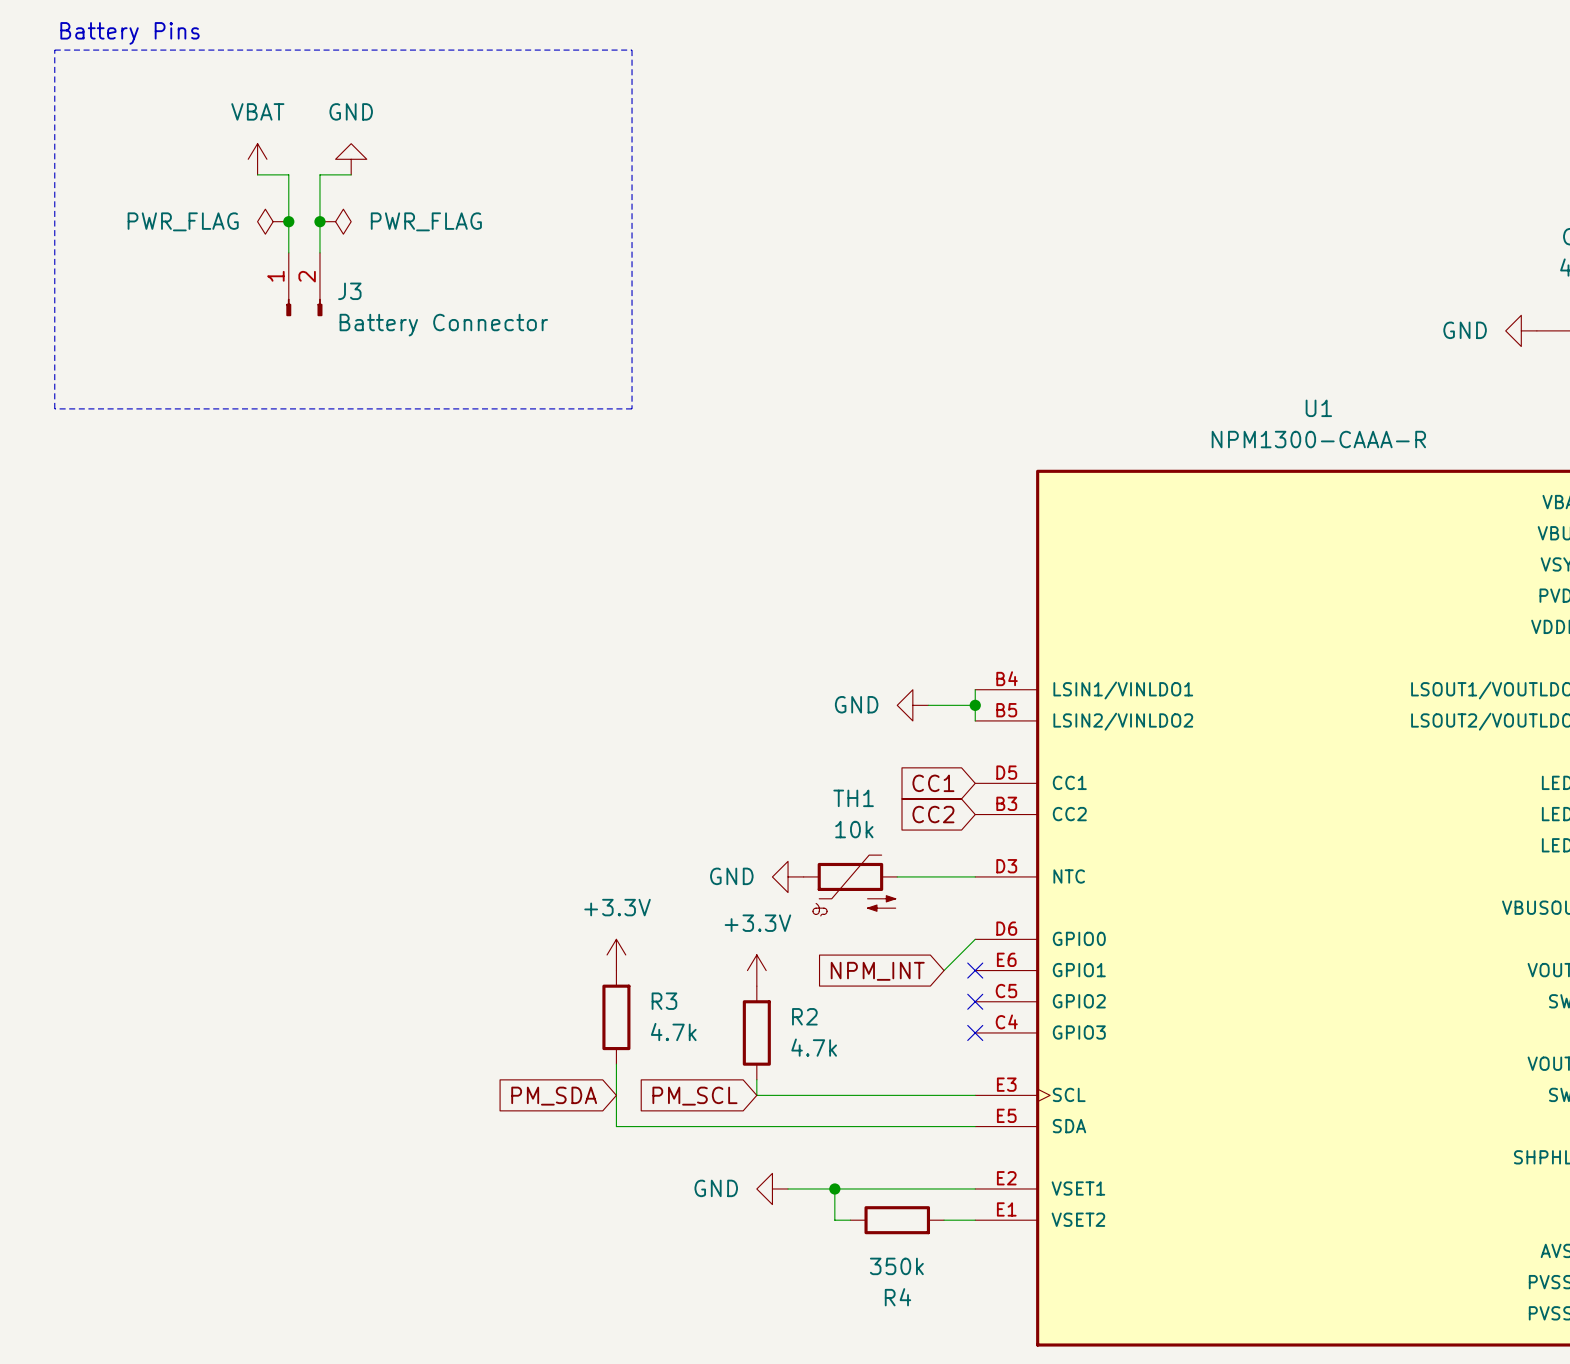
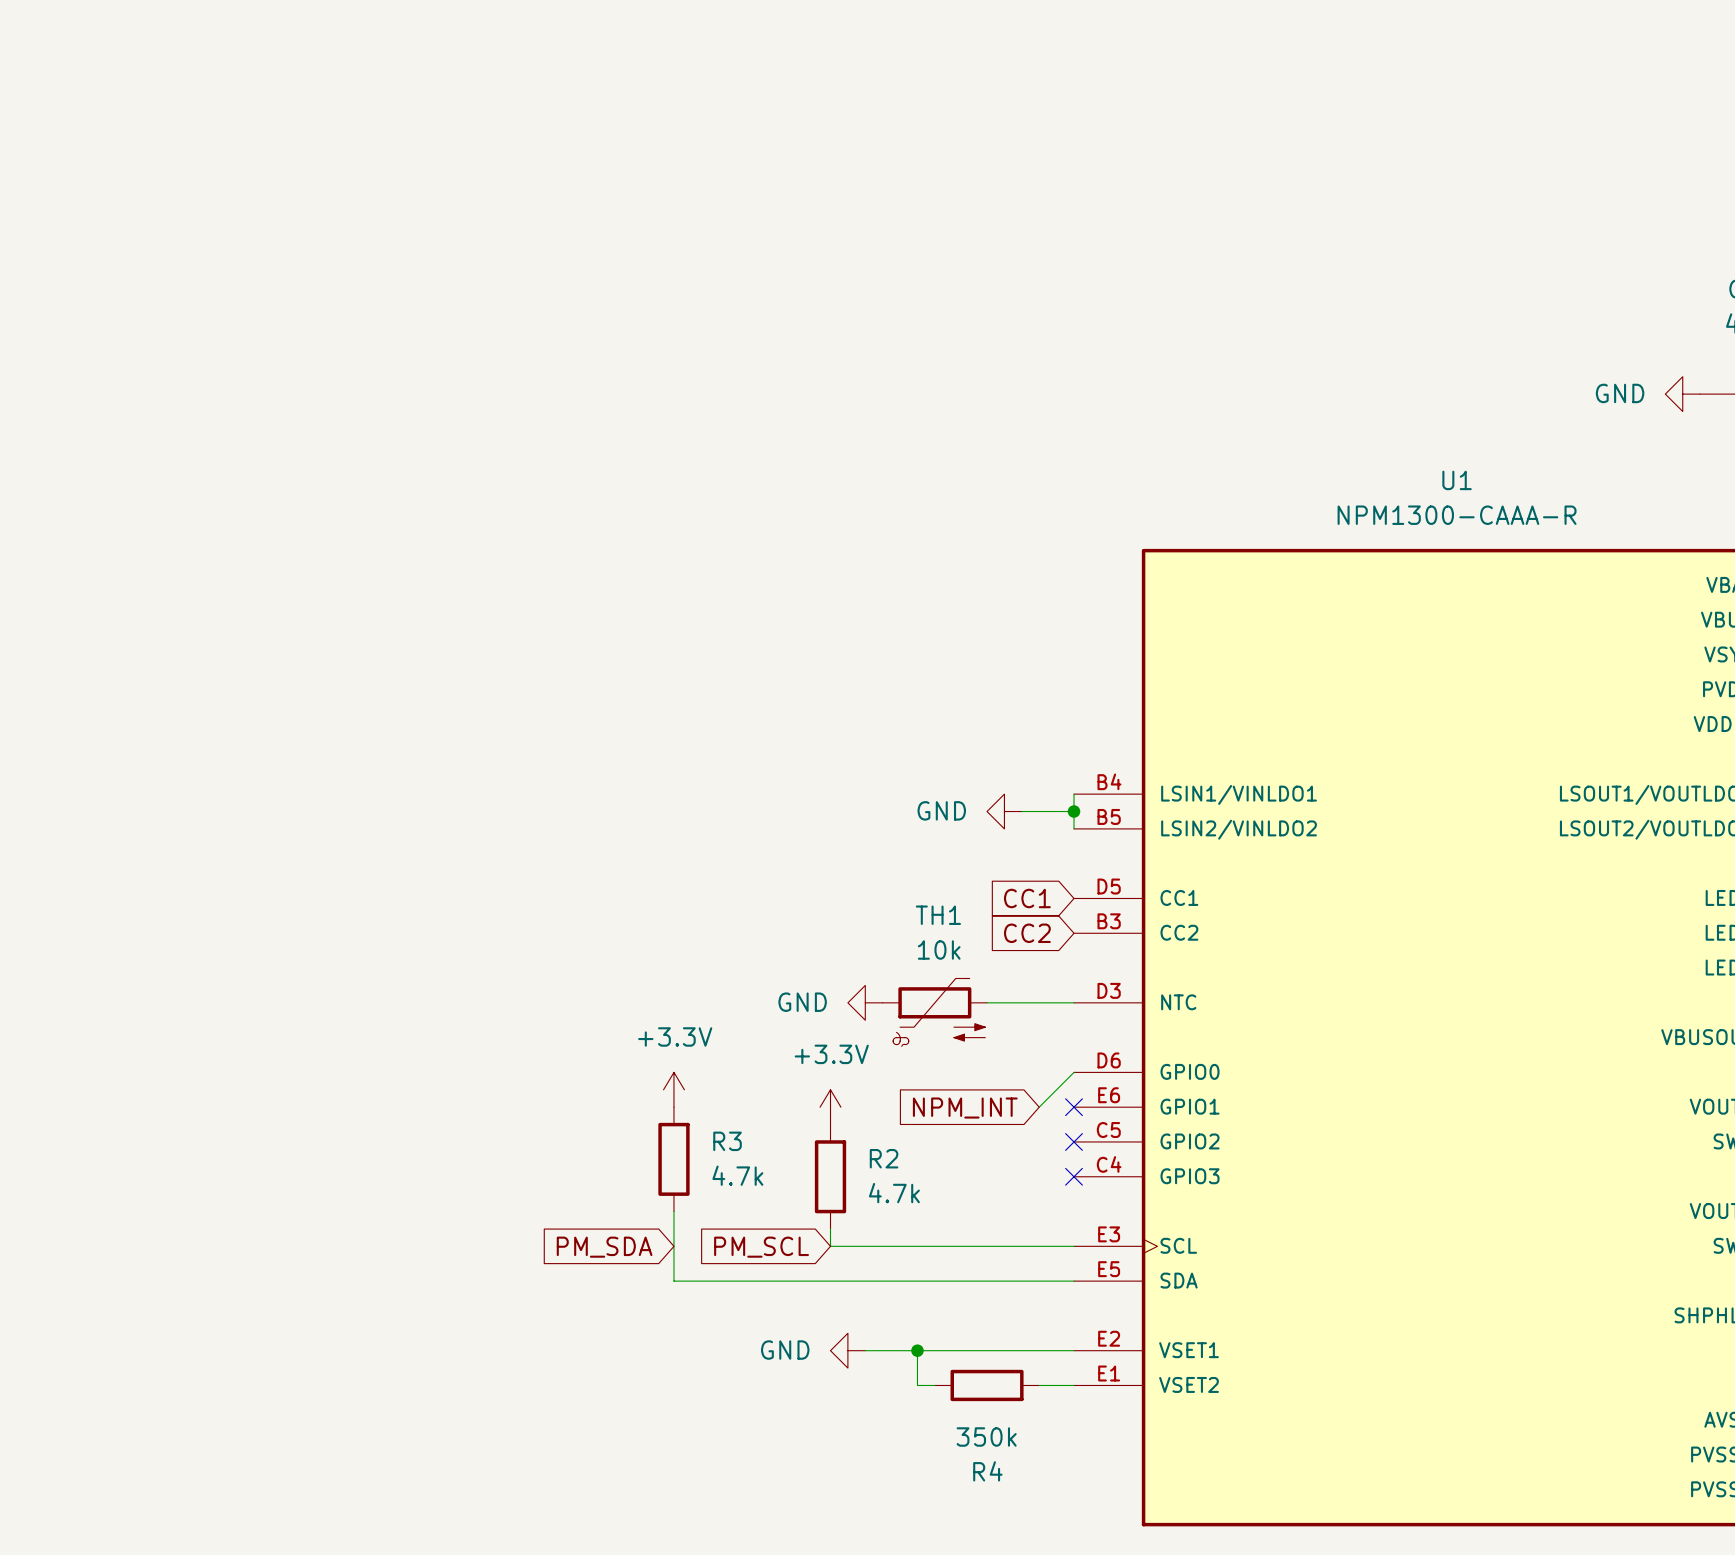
text: Battery Pins (130, 33) -> none
line: (54, 50) (632, 50) (632, 408) (54, 408) (54, 50) -> none
power symbol: VBAT (257, 159) -> none
power symbol: GND (351, 159) -> none
wire: (257, 174) (288, 174) (288, 252) -> none
wire: (351, 174) (319, 174) (319, 252) -> none
power symbol: PWR_FLAG (273, 221) -> none
junction: (288, 221) -> none
junction: (319, 221) -> none
power symbol: PWR_FLAG (335, 221) -> none
J3: Battery Connector (304, 284) -> none

